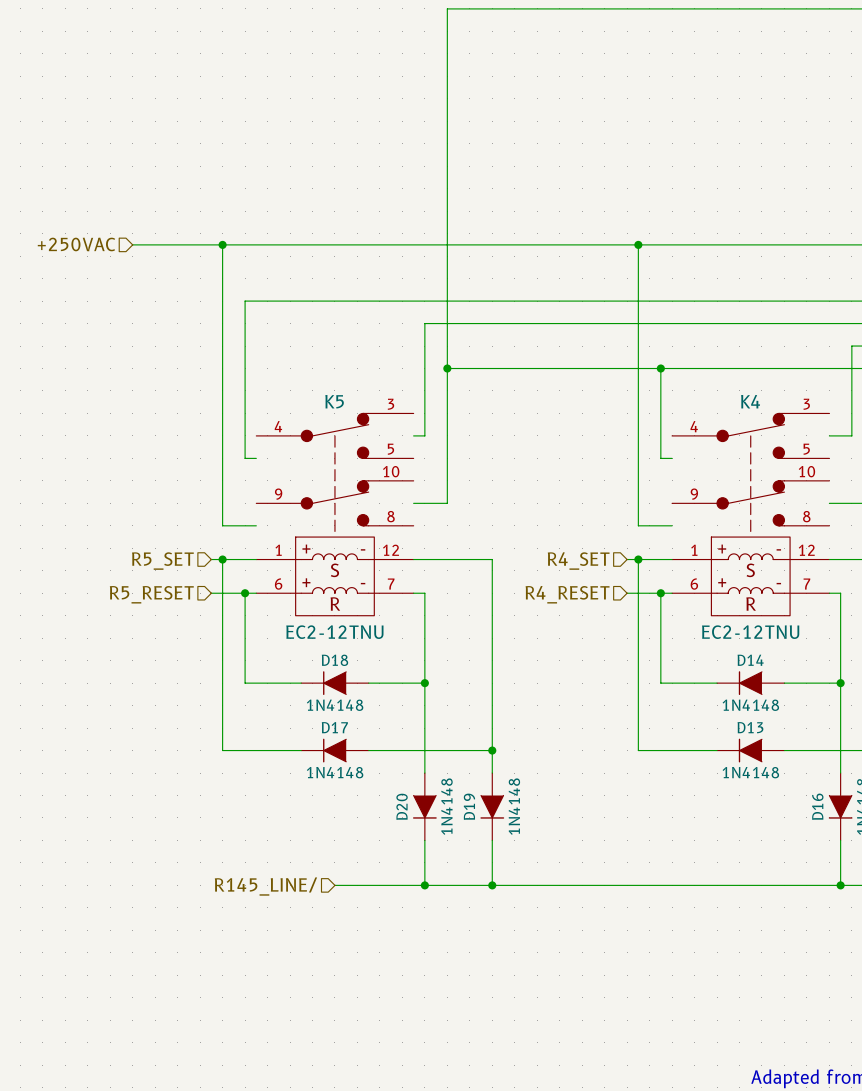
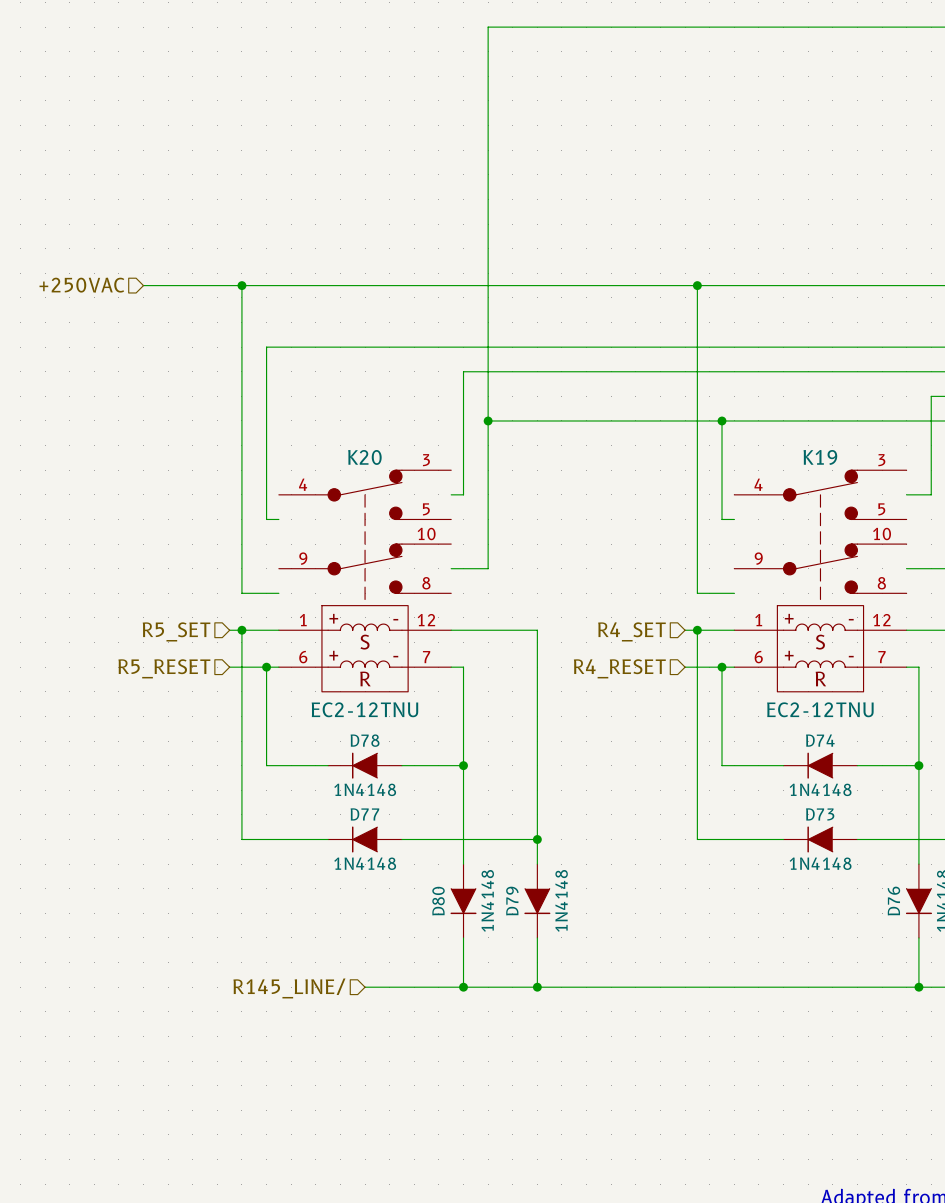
K5 name: K5 (334, 401) -> K20 (364, 457)
K4 name: K4 (750, 401) -> K19 (820, 457)
D18 name: D18 (334, 660) -> D78 (365, 740)
D14 name: D14 (750, 660) -> D74 (820, 740)
D17 name: D17 (334, 727) -> D77 (364, 814)
D13 name: D13 (750, 727) -> D73 (820, 814)
D20 name: D20 (402, 806) -> D80 (438, 901)
D19 name: D19 (469, 806) -> D79 (512, 901)
D16 name: D16 (817, 806) -> D76 (893, 901)

